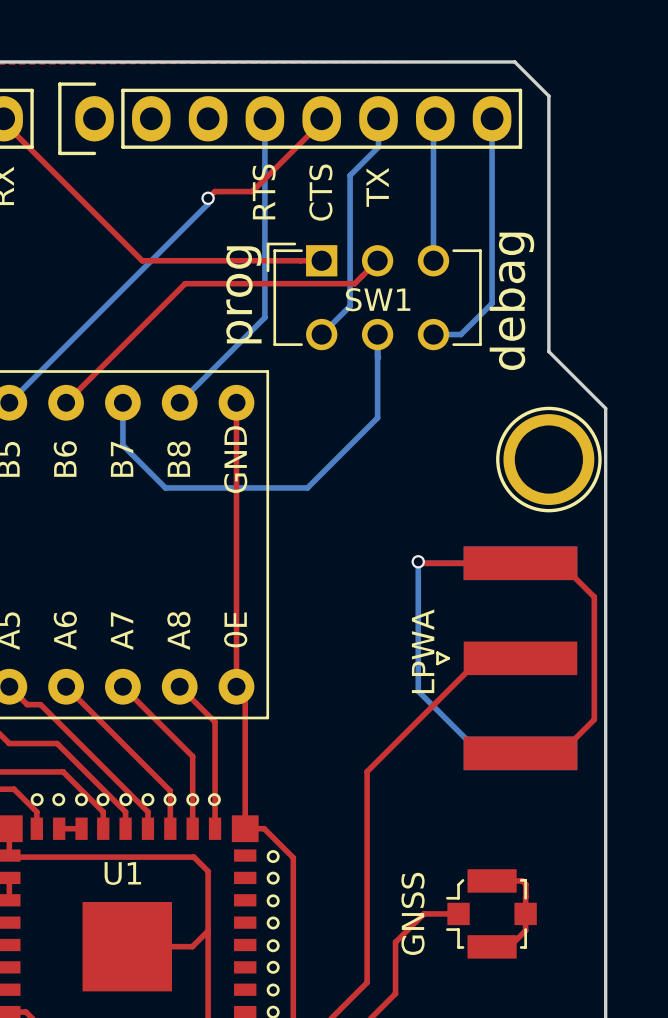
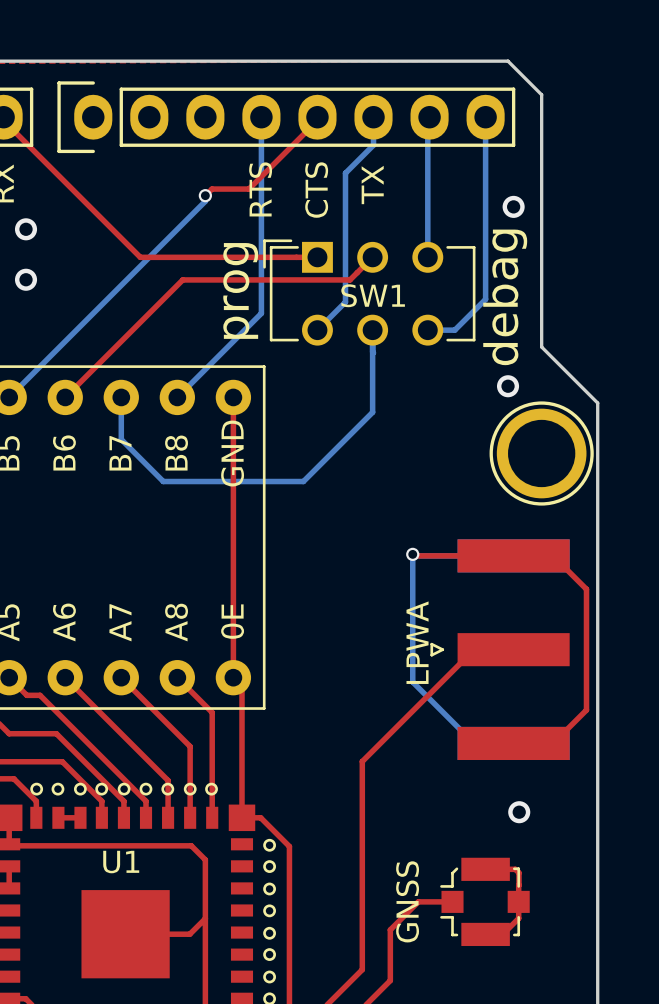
via: none -> (513, 206)
via: none -> (26, 229)
via: none -> (26, 279)
via: none -> (508, 386)
via: none -> (519, 812)

